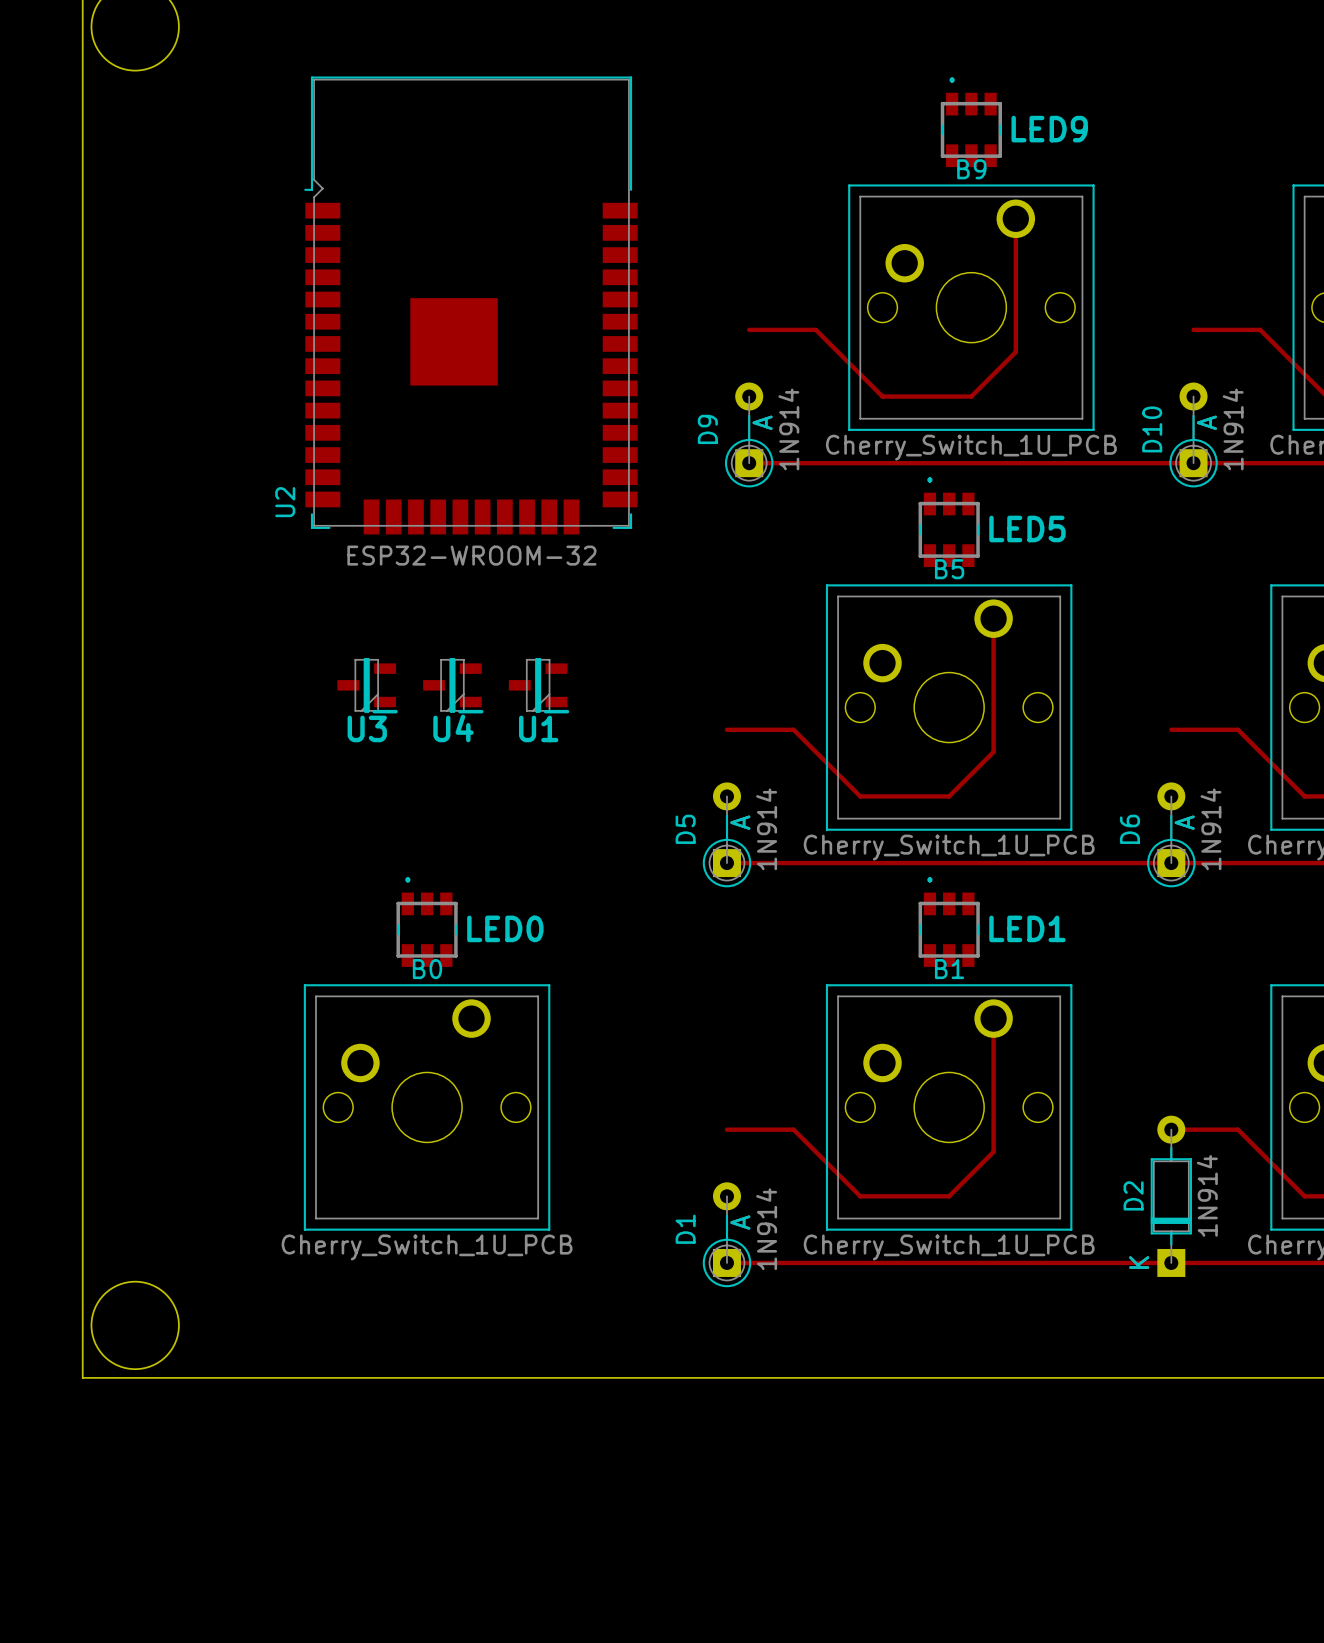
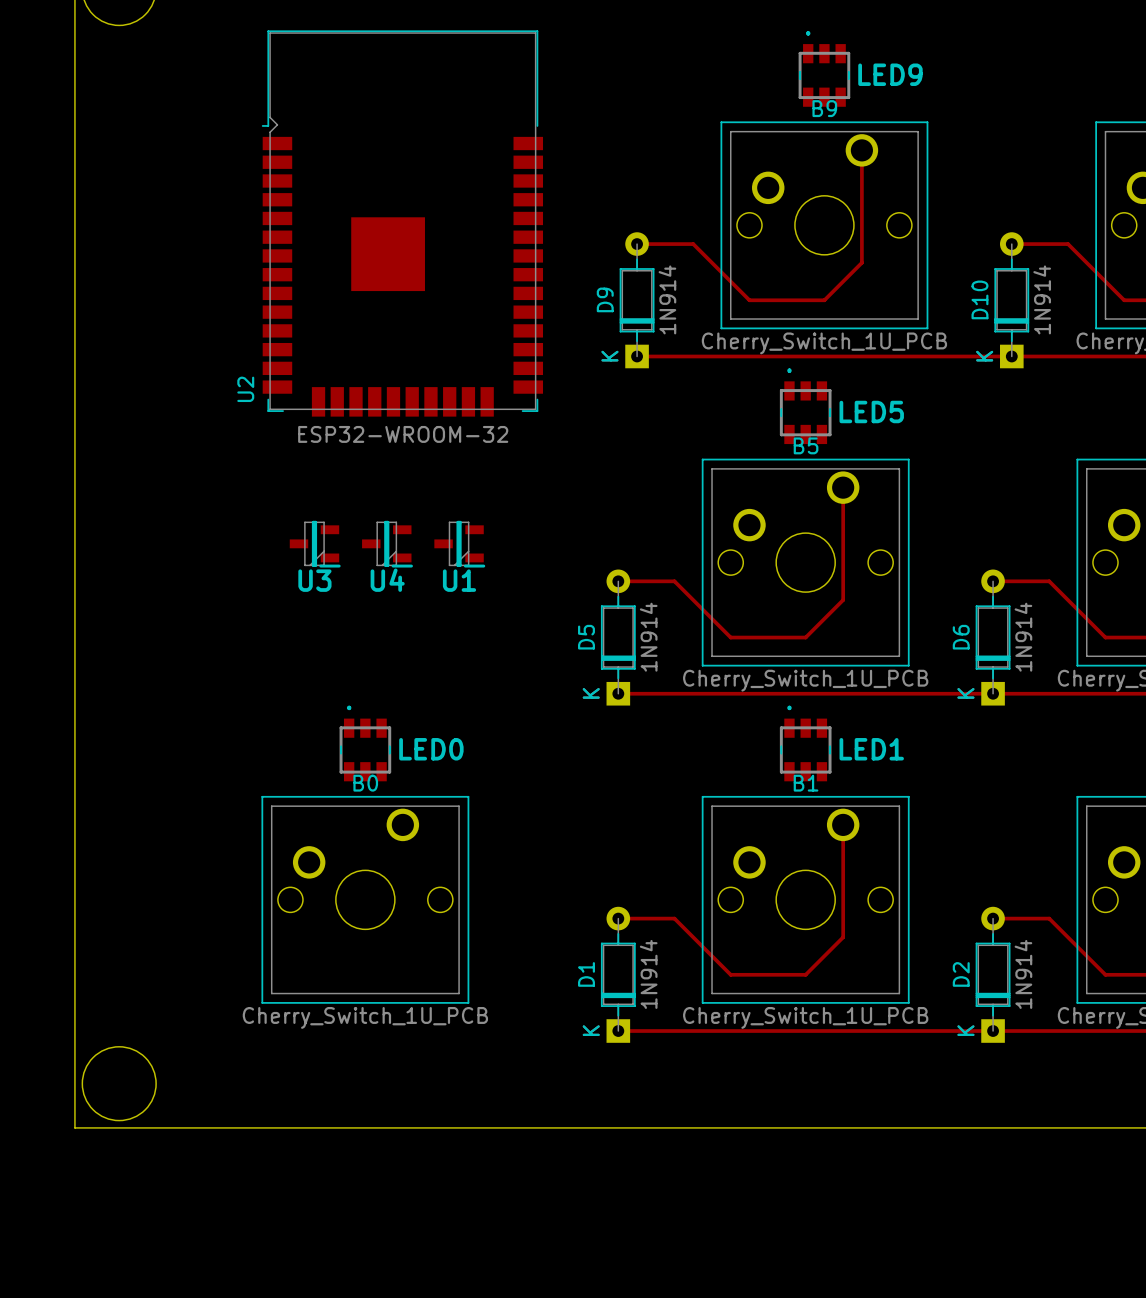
D9 footprint: [724, 382, 774, 488] -> [619, 232, 655, 369]
D10 footprint: [1169, 382, 1218, 488] -> [994, 232, 1030, 369]
D5 footprint: [702, 782, 752, 888] -> [600, 569, 636, 706]
D6 footprint: [1147, 782, 1196, 888] -> [975, 569, 1011, 706]
D1 footprint: [702, 1182, 752, 1288] -> [600, 906, 636, 1043]

